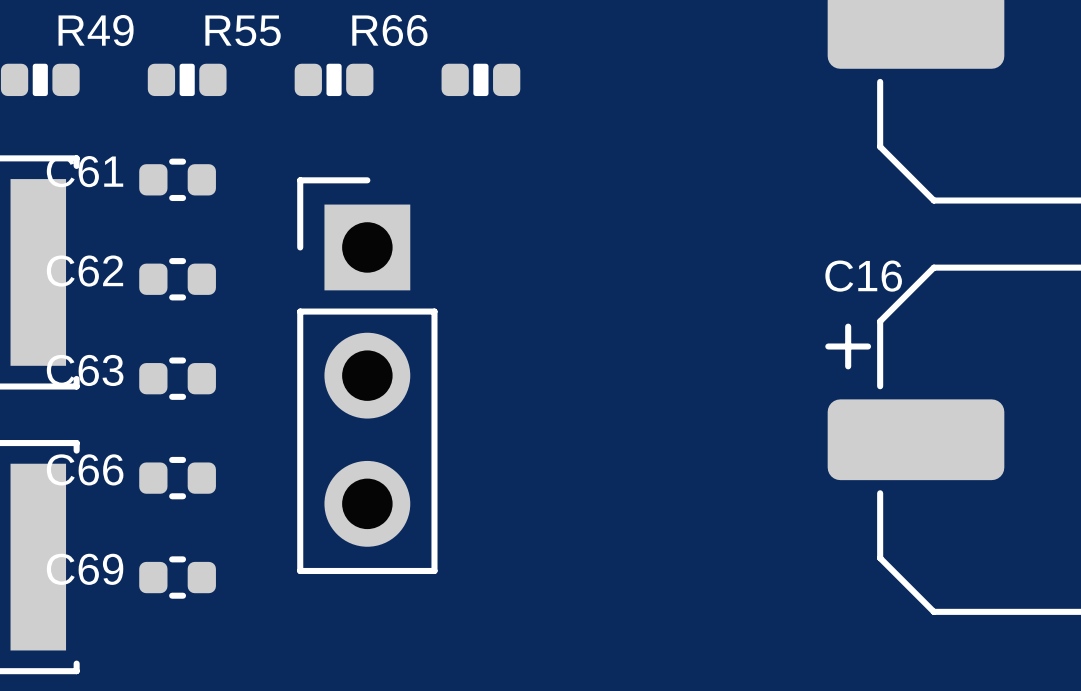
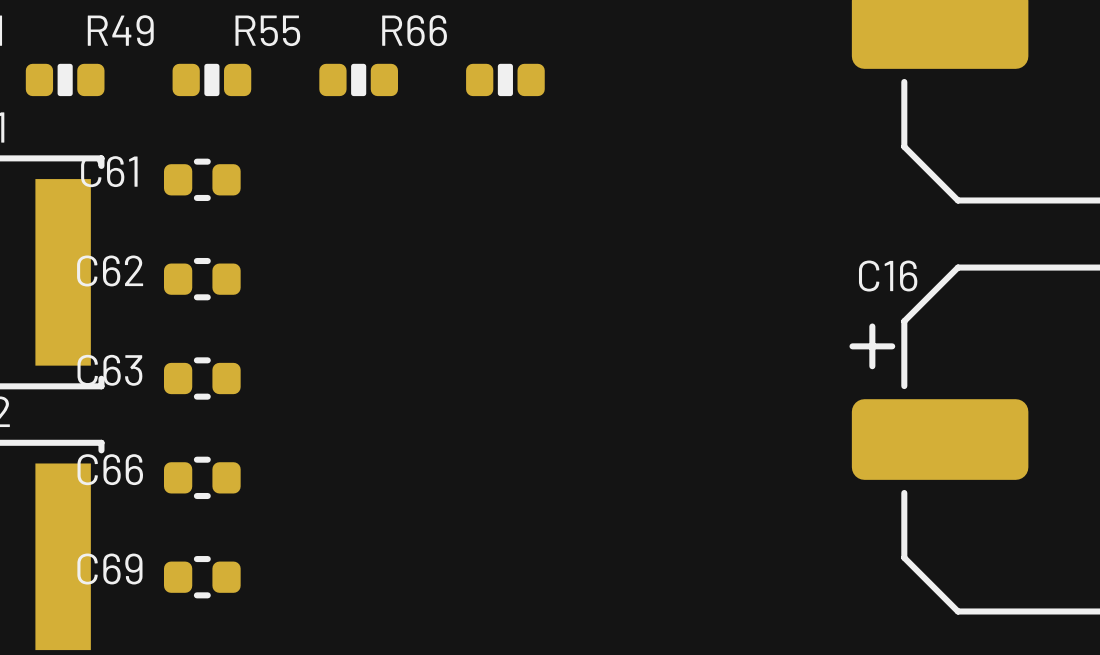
part: (367, 375) -> none

